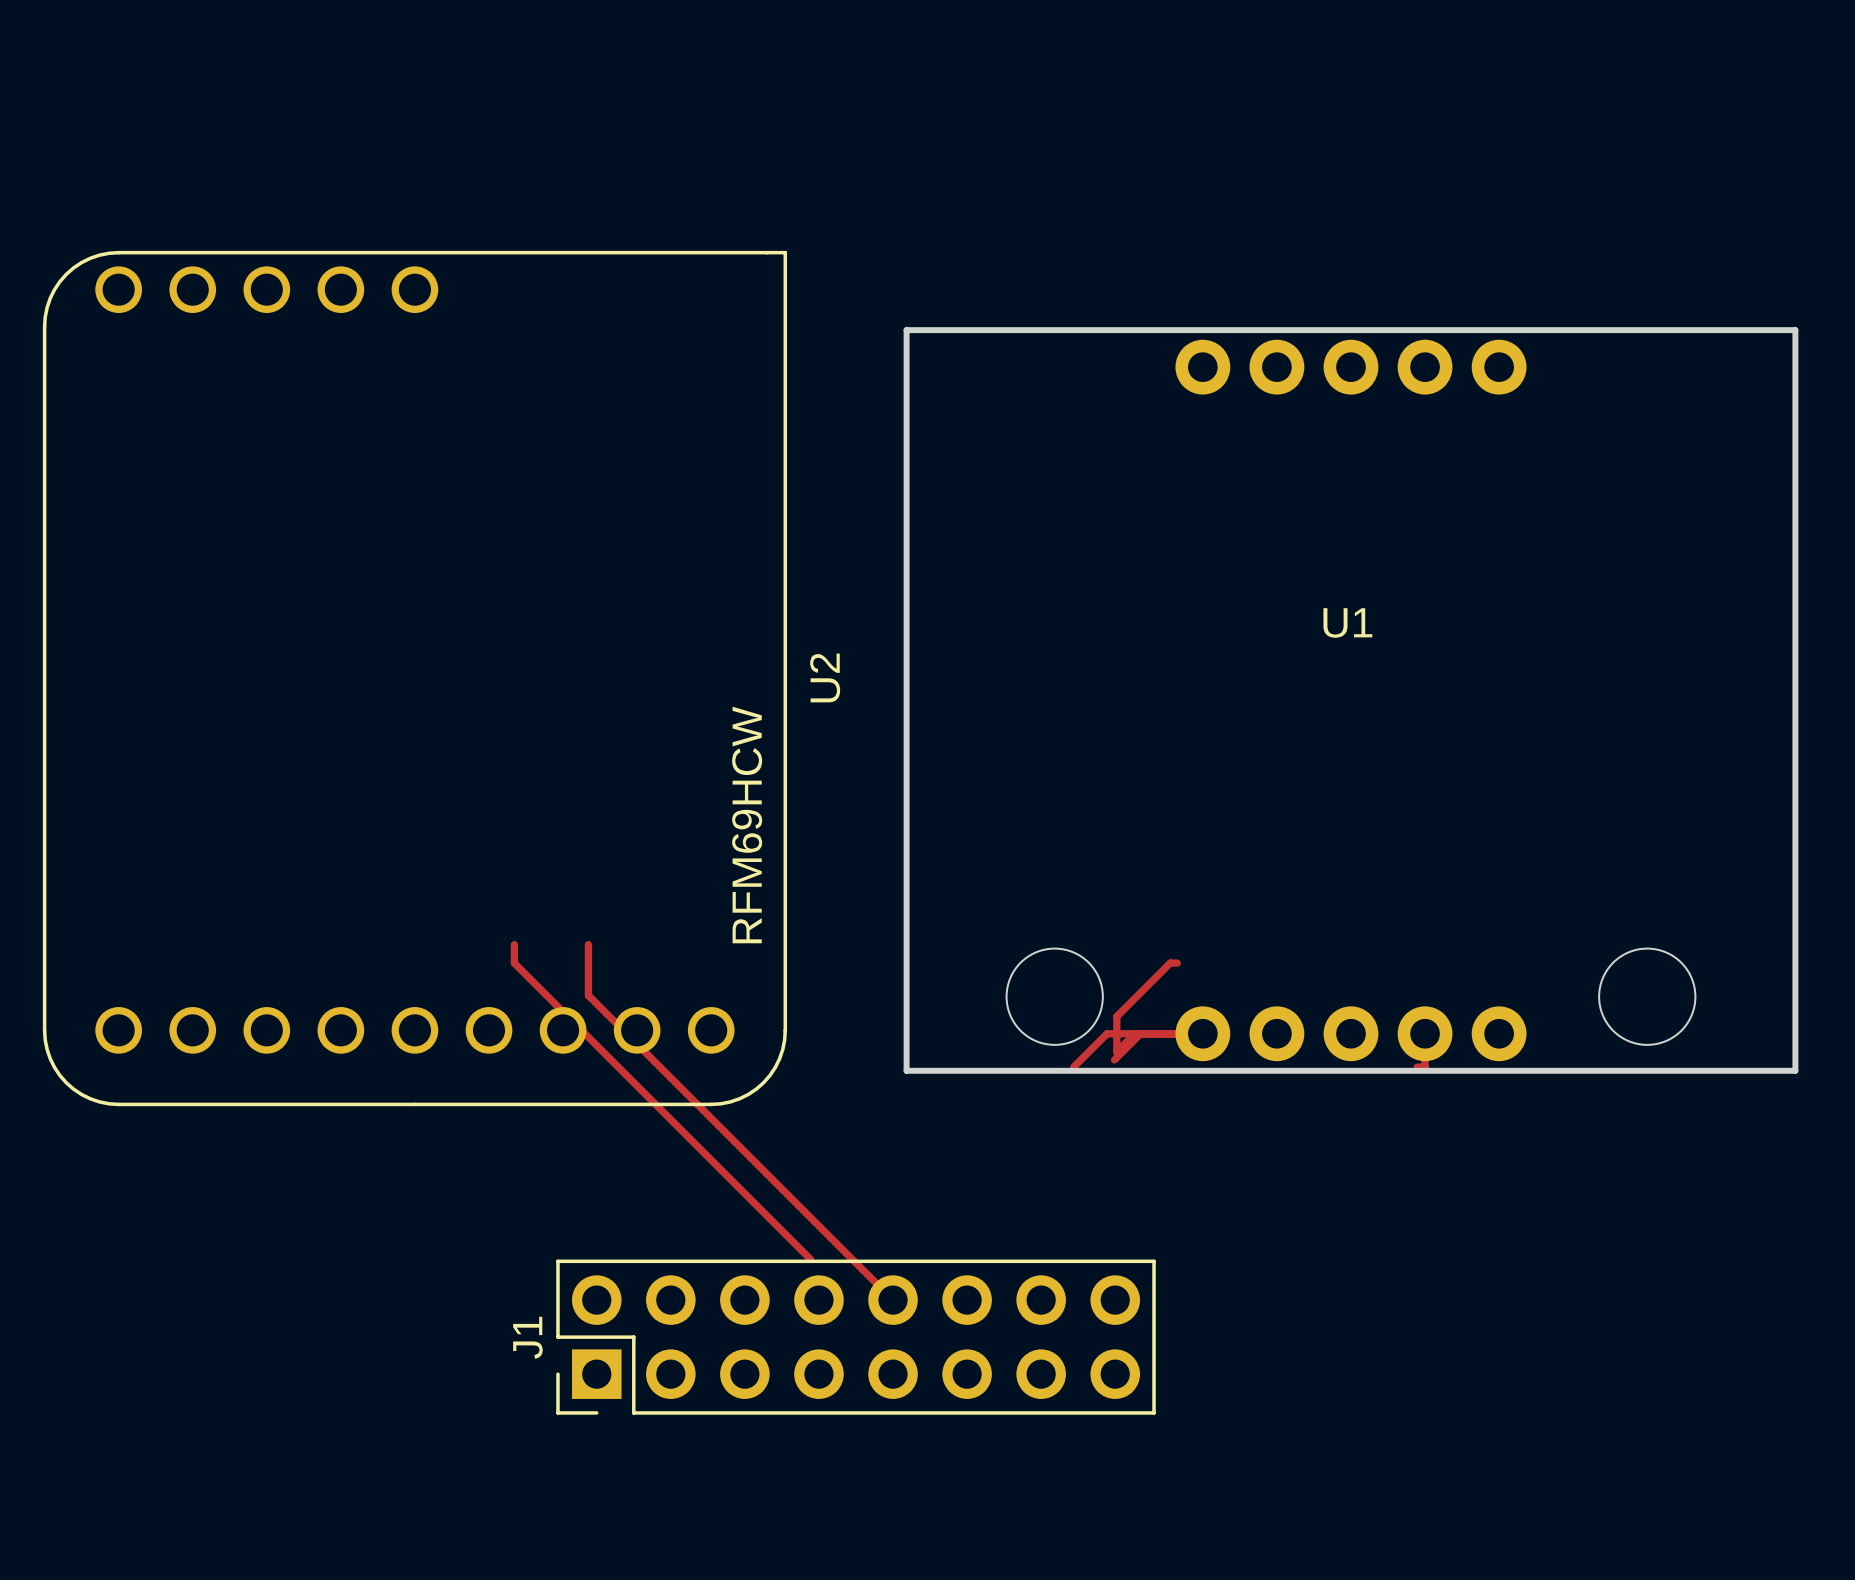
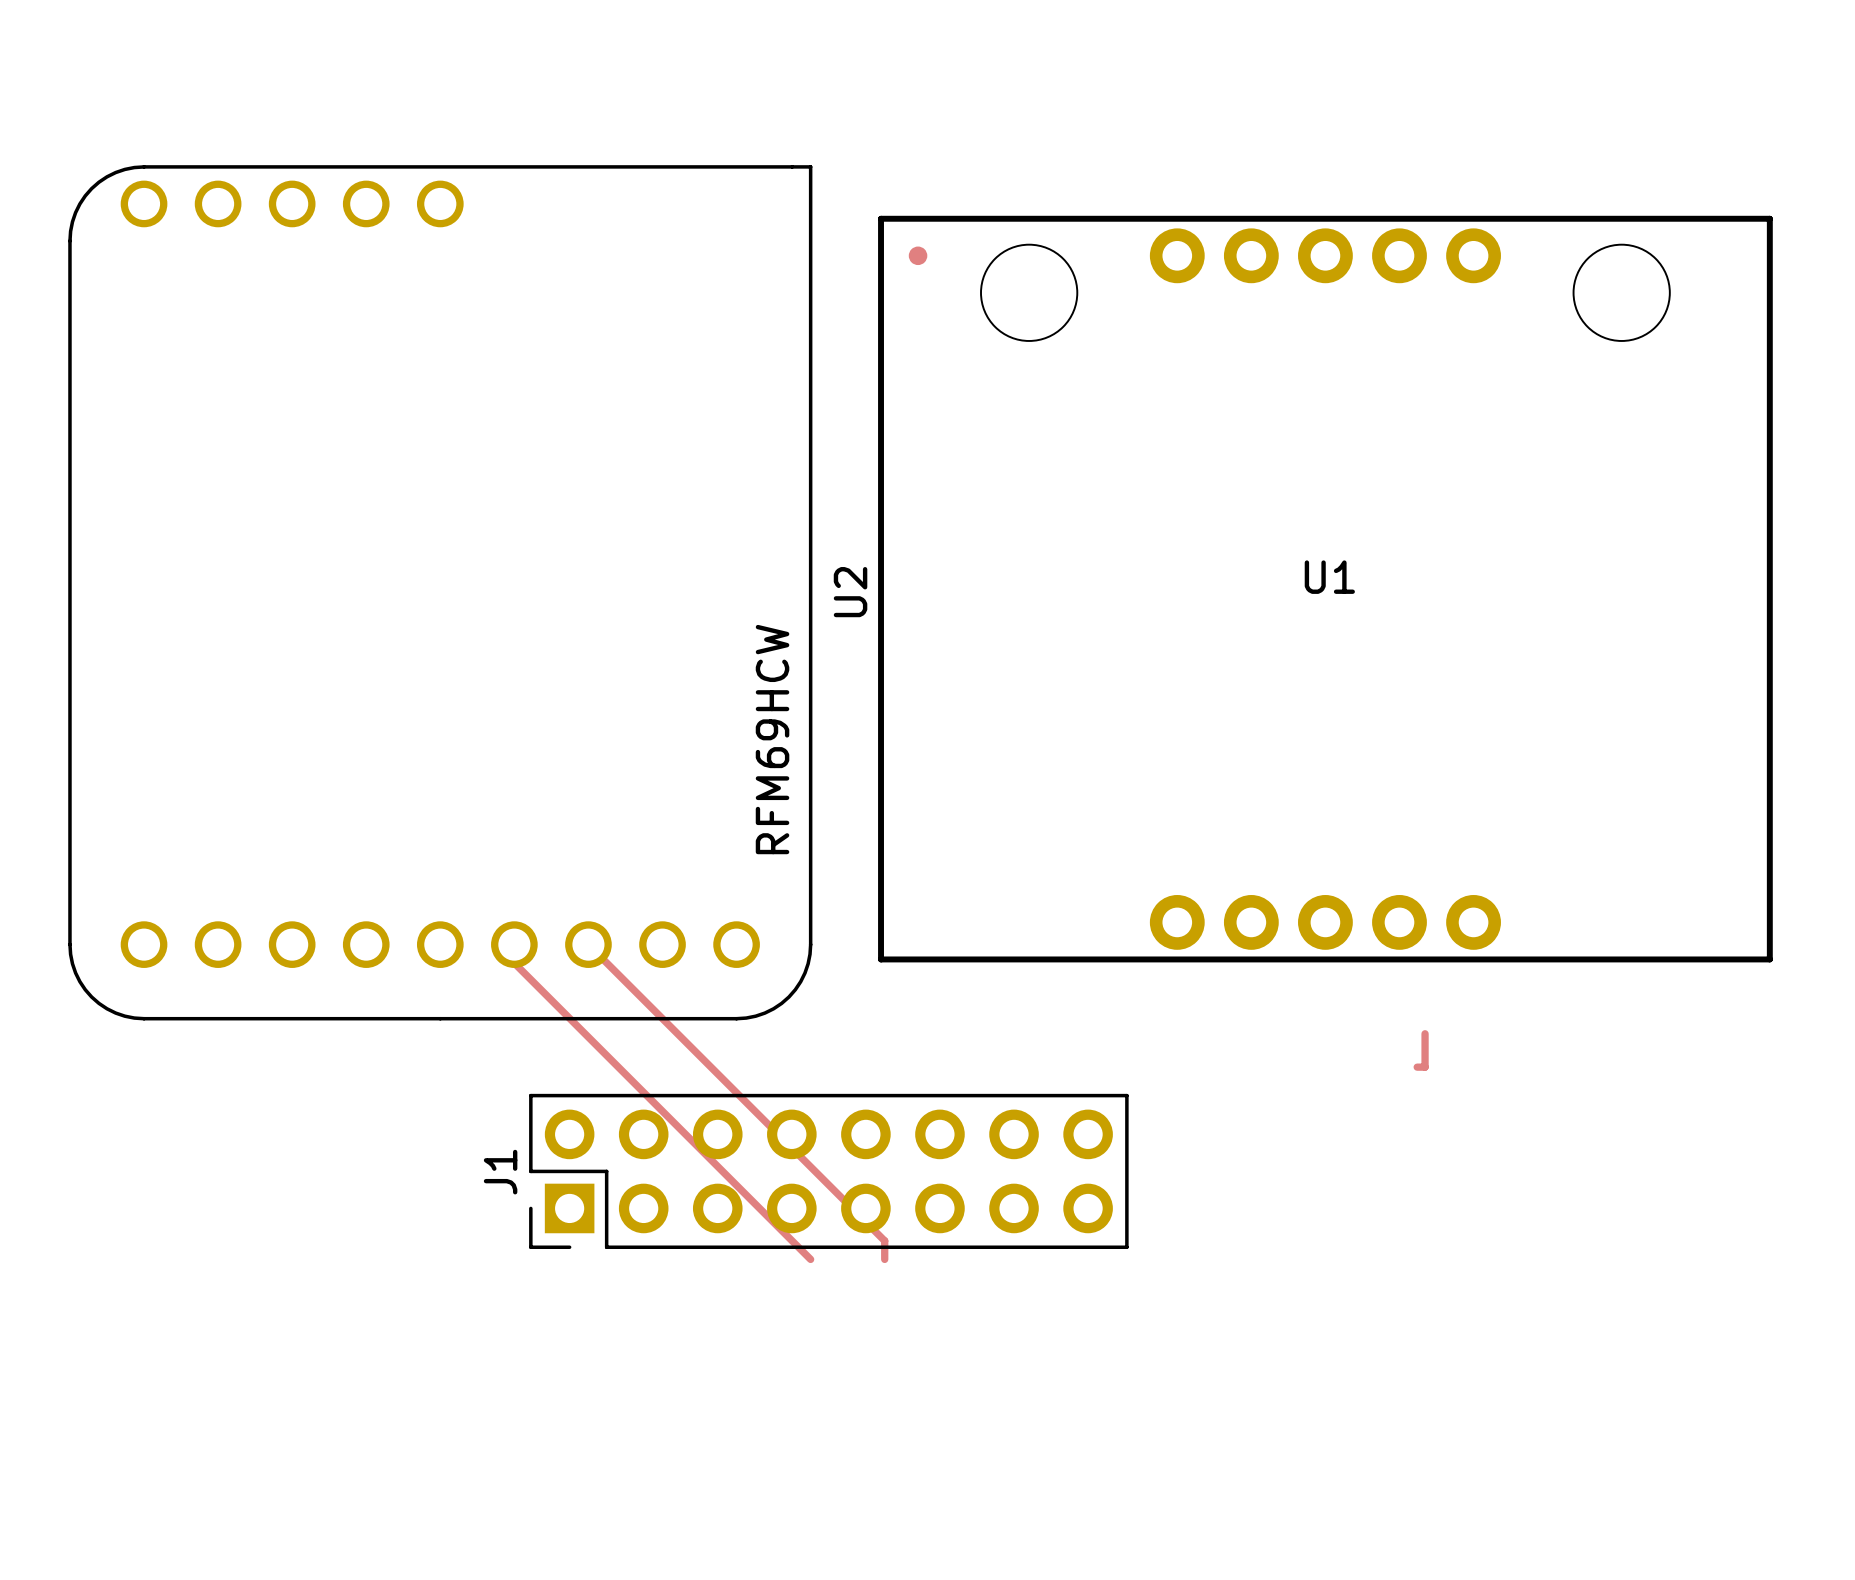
U1 footprint: [903, 327, 1799, 1074] -> [878, 215, 1773, 963]
U1 name position: U1 (1347, 622) -> U1 (1329, 577)
U2 position: (414, 678) -> (440, 592)
track: (588, 944) (588, 995) (893, 1300) -> (588, 944) (884, 1240) (884, 1259)
track: (1177, 963) (1170, 963) (1116, 1016) (1116, 1051) (1134, 1033) -> none
track: (1140, 1033) (1114, 1059) -> none
track: (1202, 1033) (1107, 1033) (1073, 1067) -> none
J1 position: (855, 1337) -> (828, 1171)

